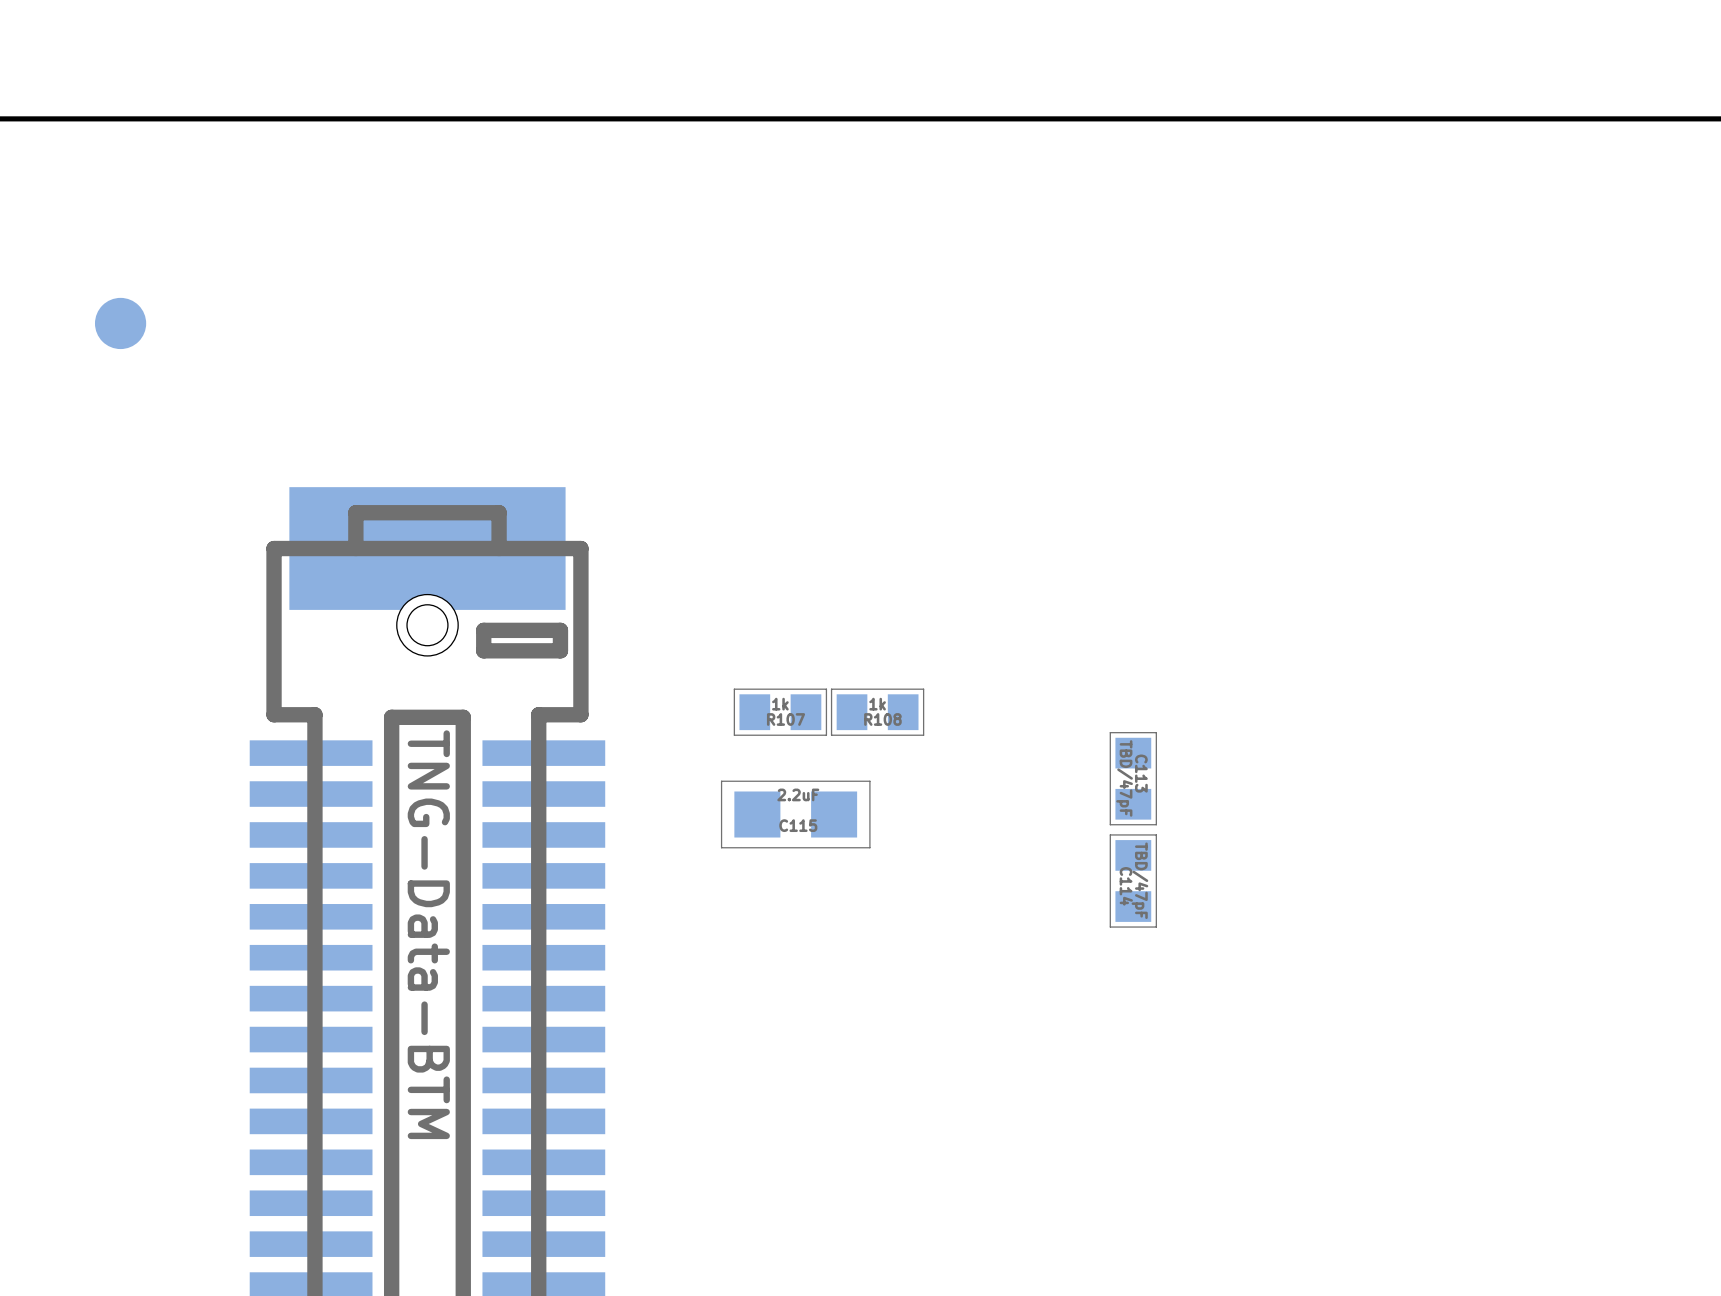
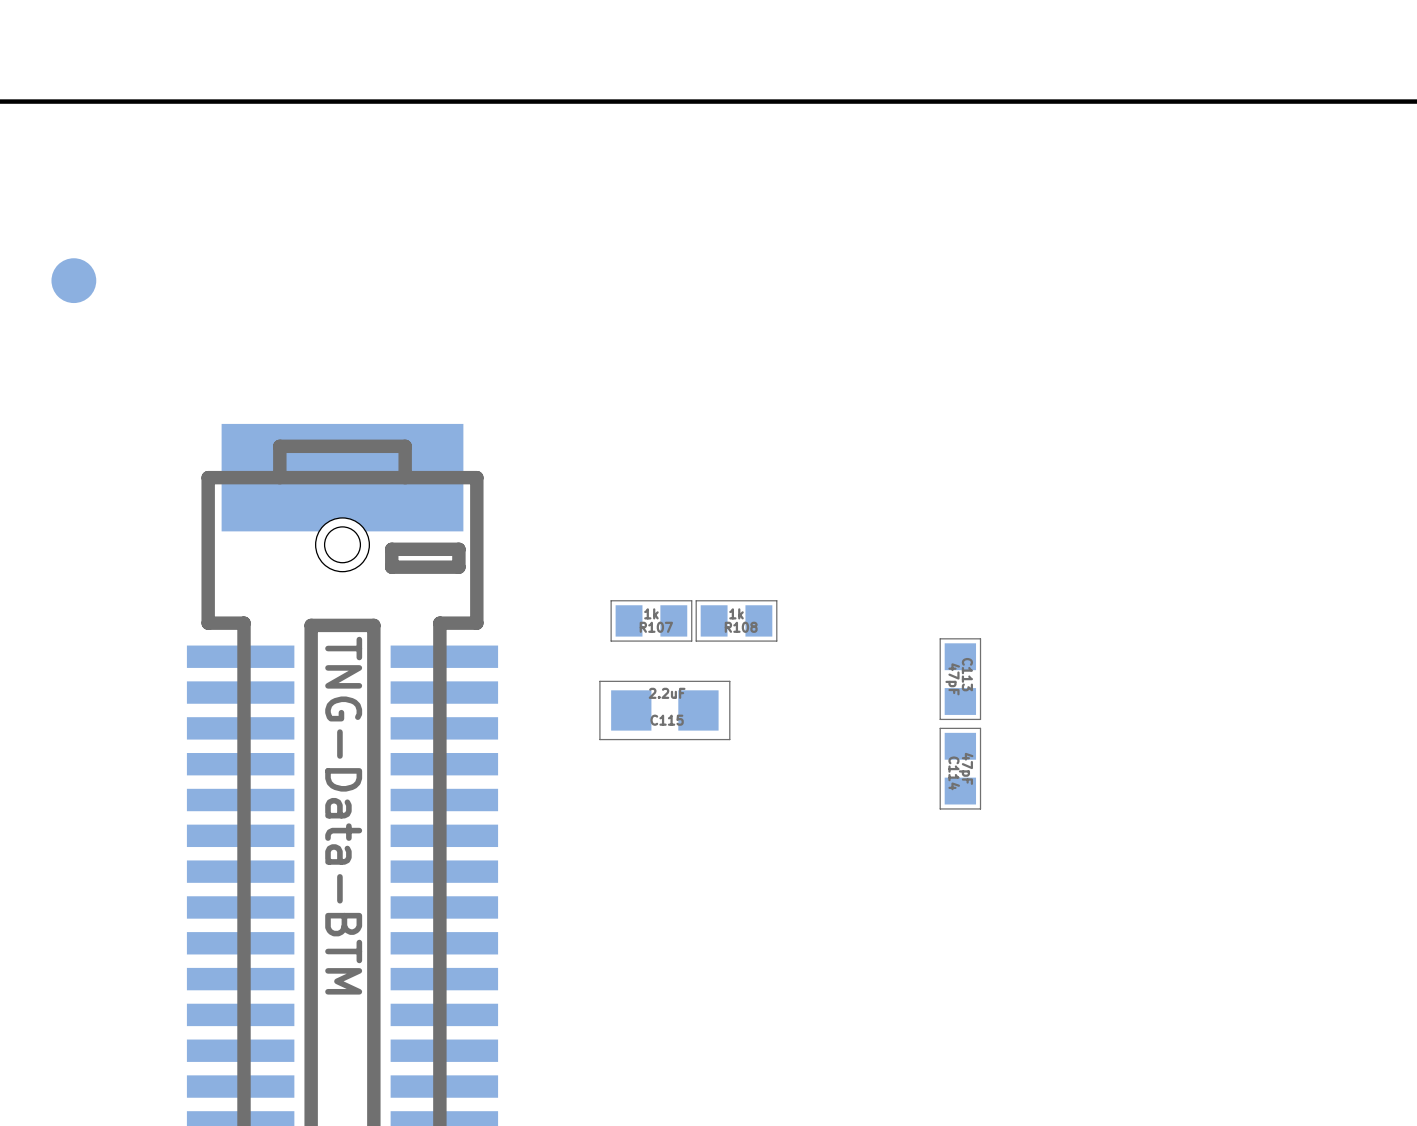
C113 value: TBD/47pF (1124, 778) -> 47pF (952, 679)
C114 value: TBD/47pF (1139, 880) -> 47pF (966, 768)

